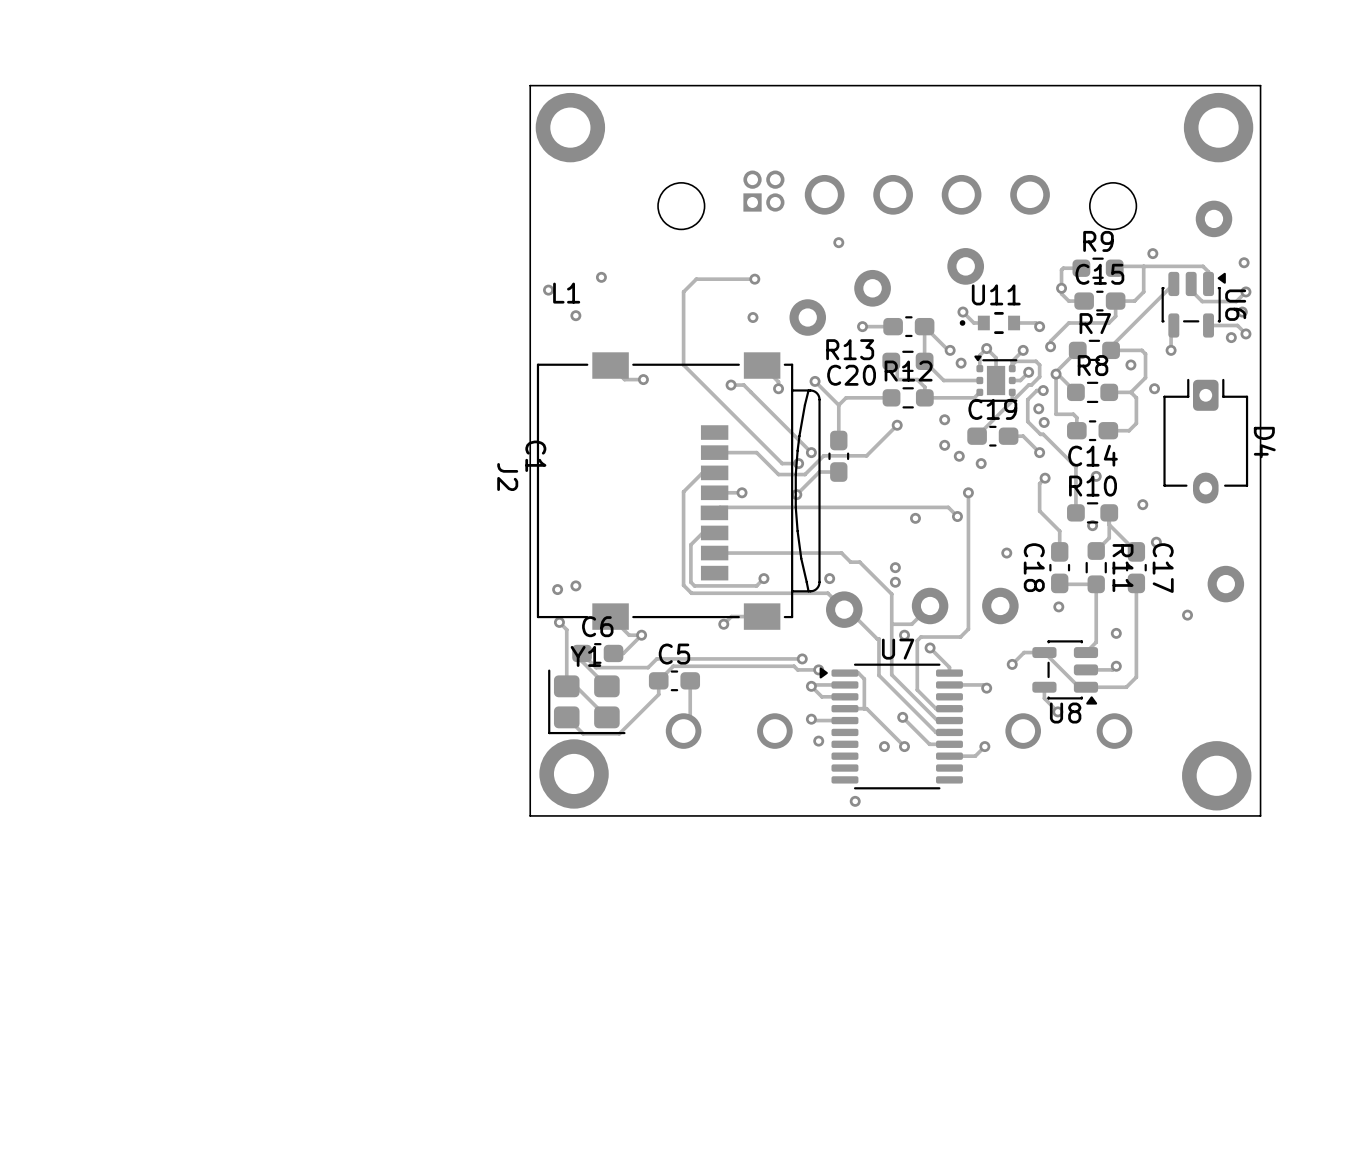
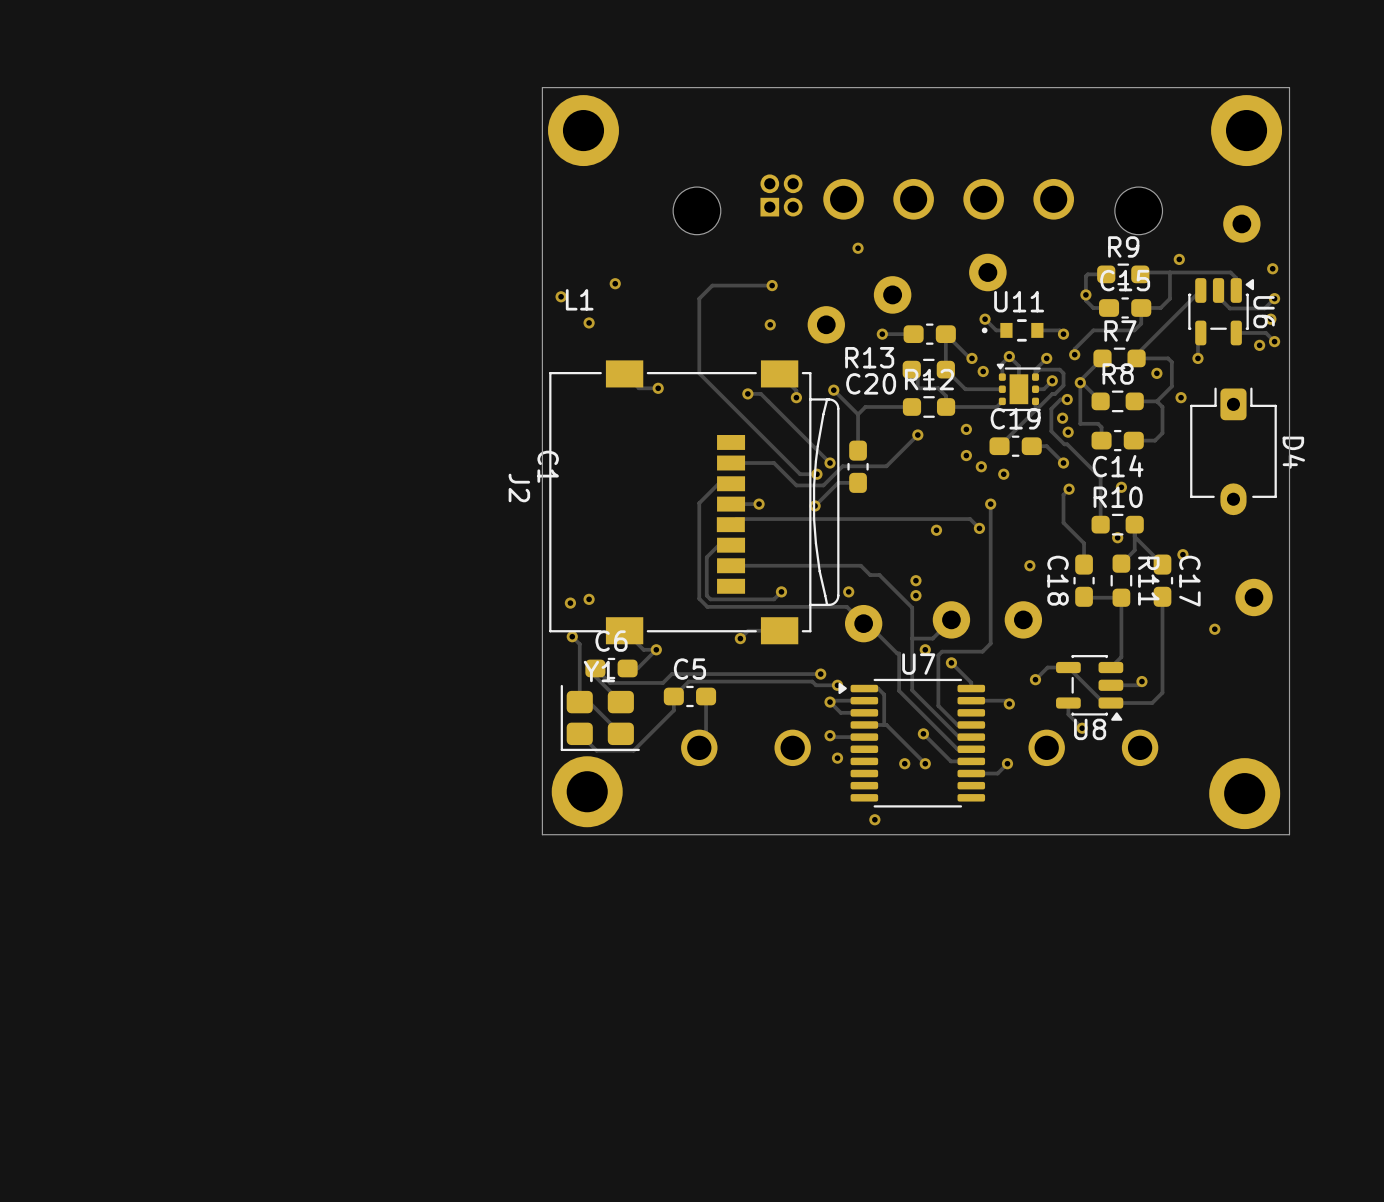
via: (1142, 504) -> none
via: (1058, 606) -> none
via: (1116, 633) -> none

